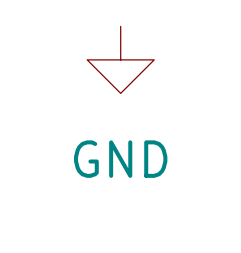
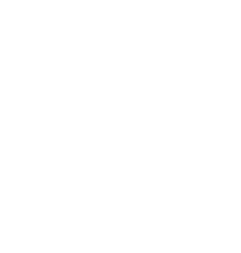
power symbol: GND (120, 59) -> none

